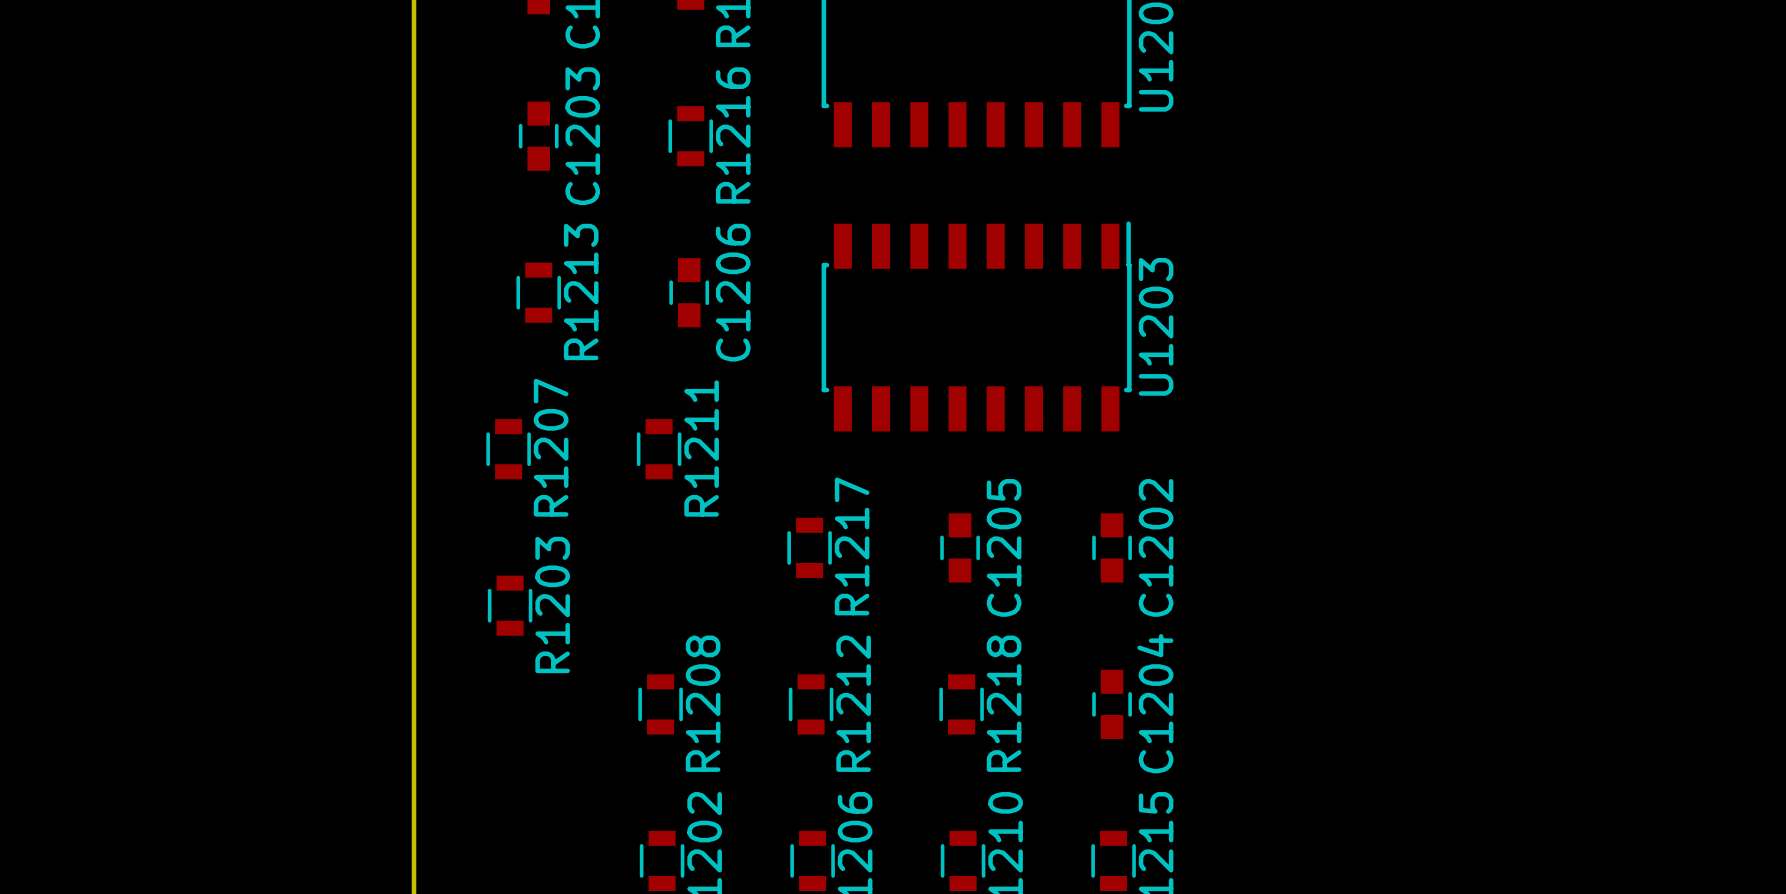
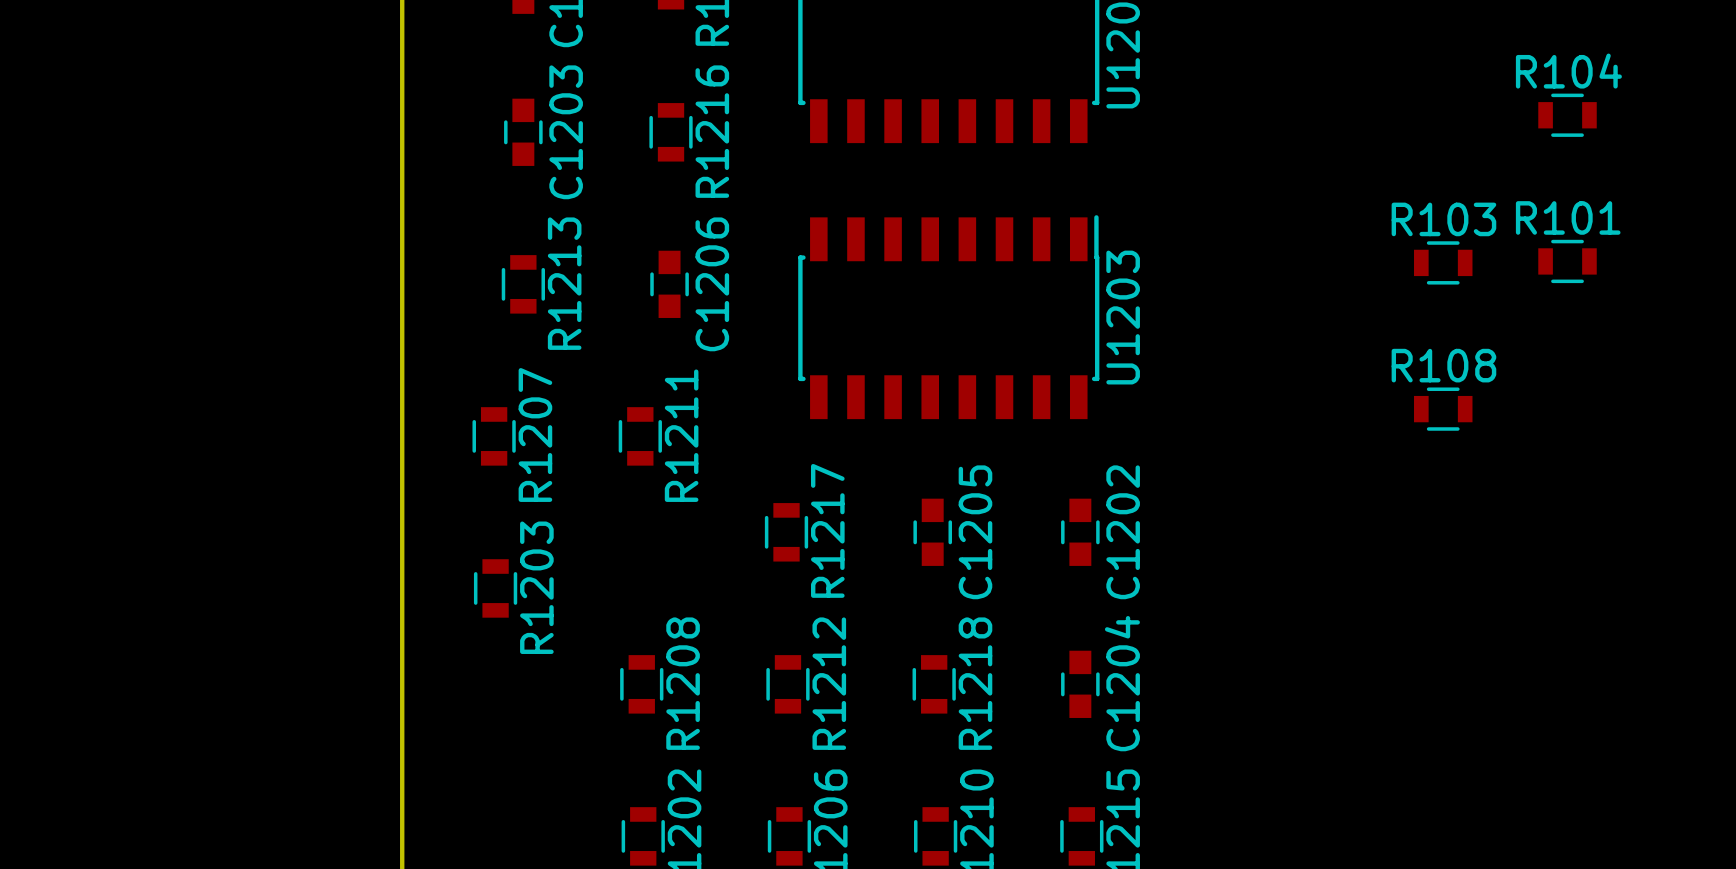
R104: none -> (1567, 115)
R101: none -> (1567, 261)
R103: none -> (1443, 262)
R108: none -> (1443, 409)

